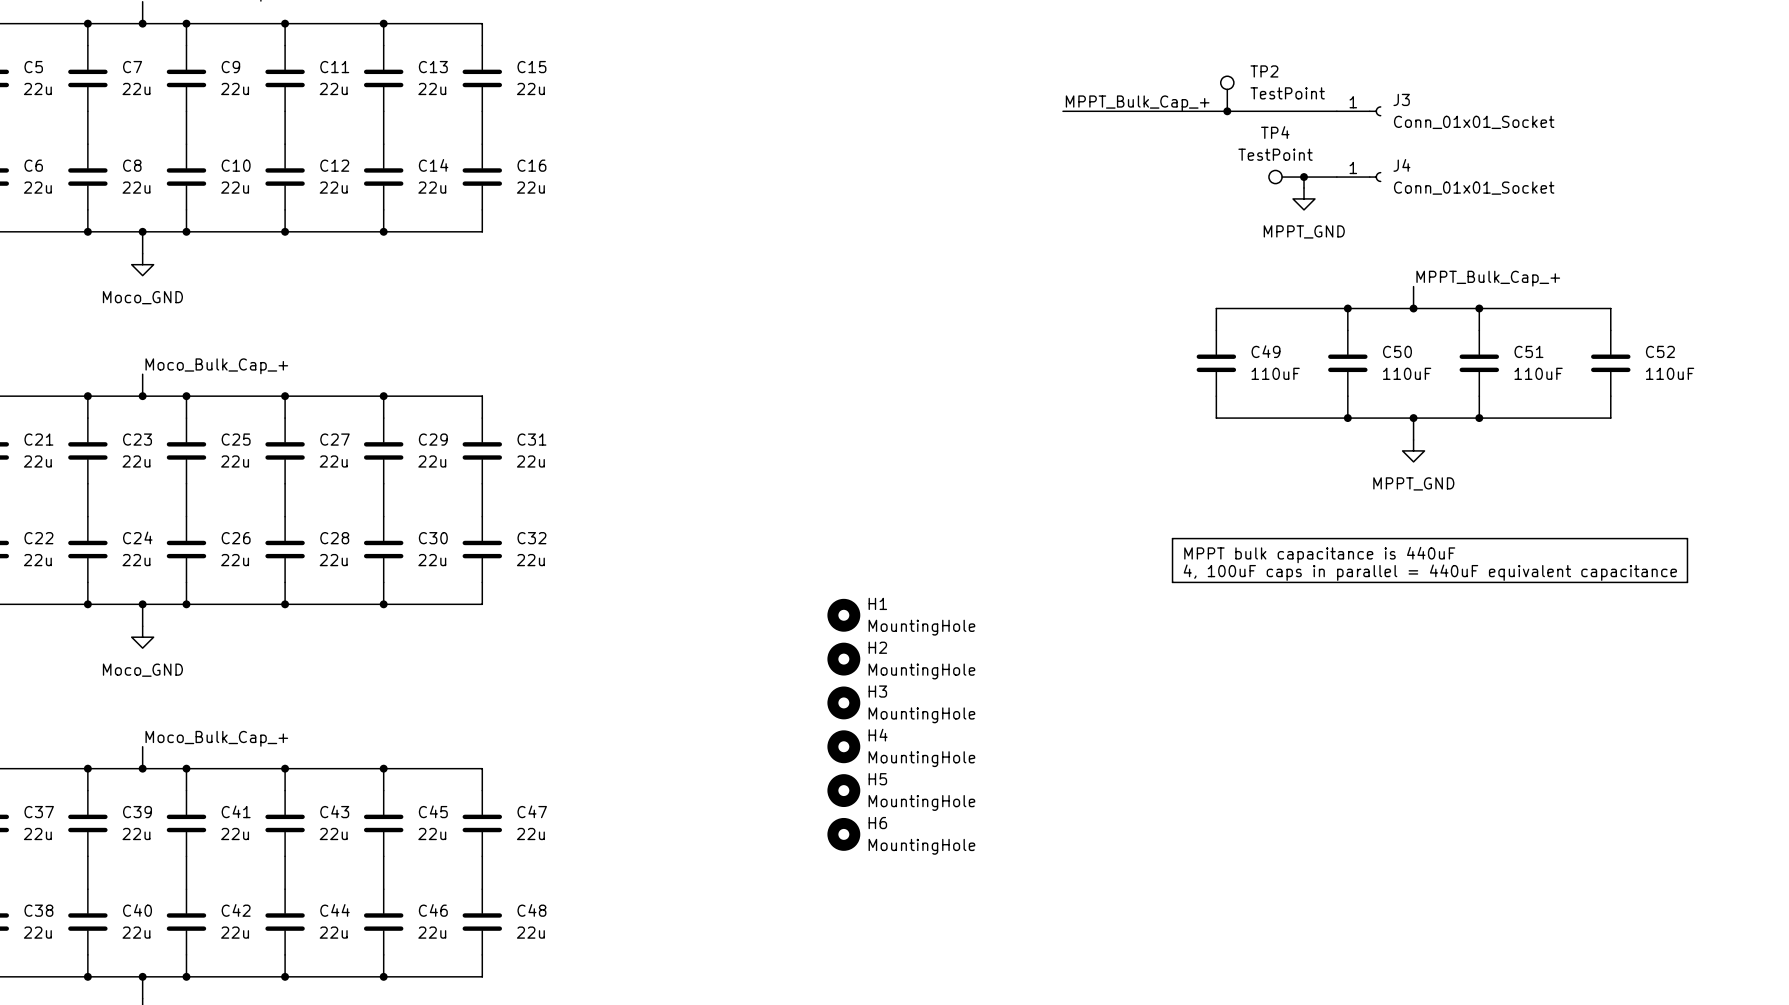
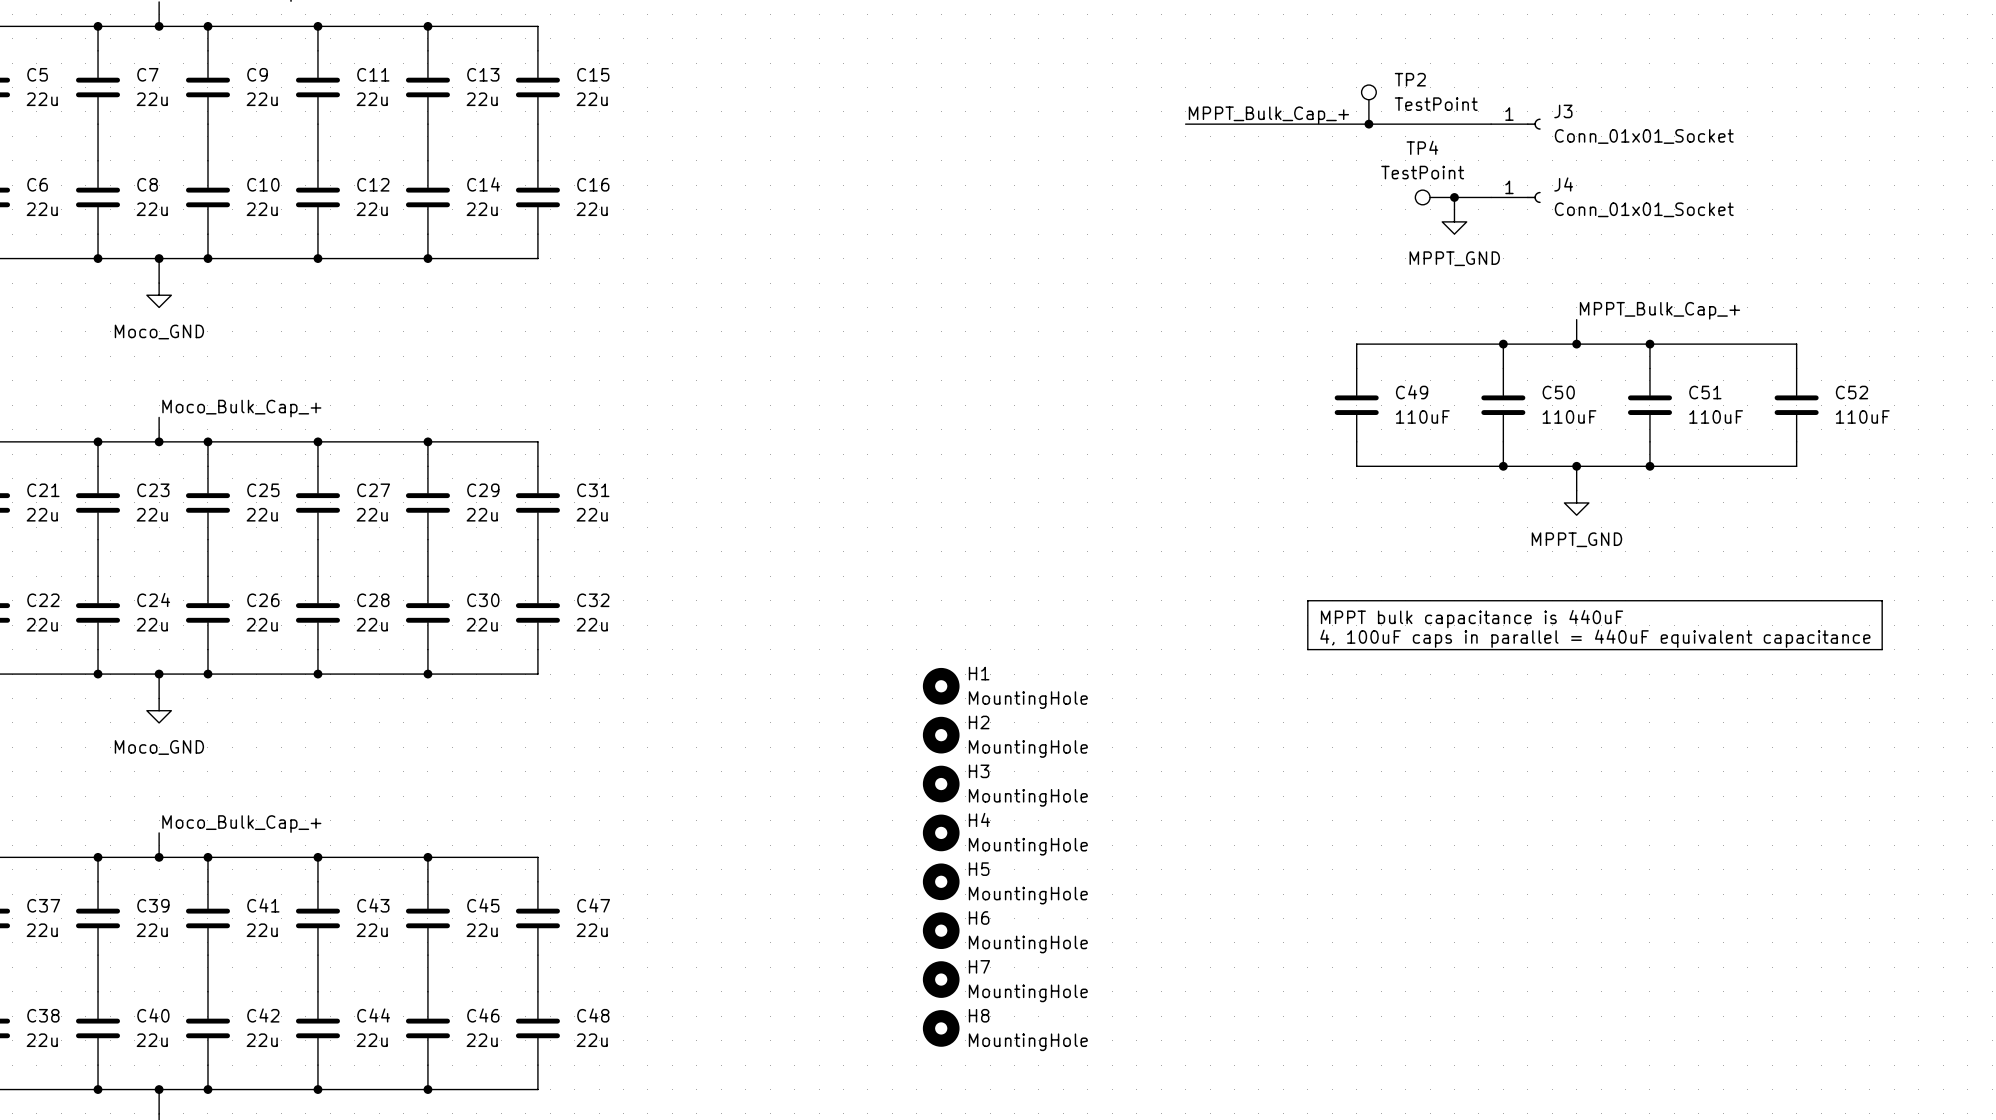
H7: none -> MountingHole (941, 979)
H8: none -> MountingHole (941, 1028)

